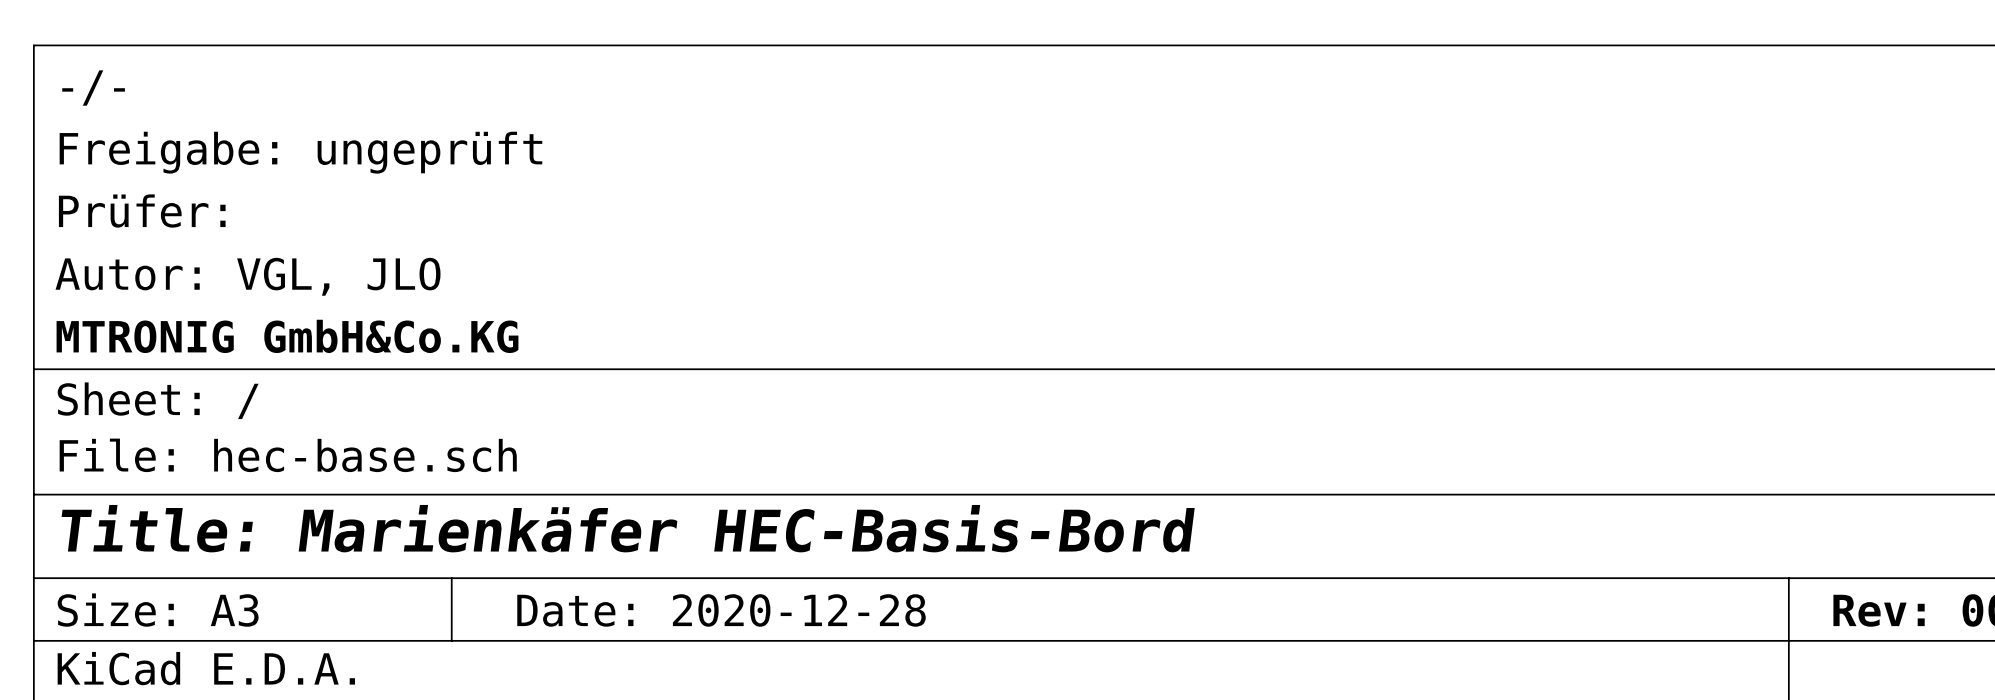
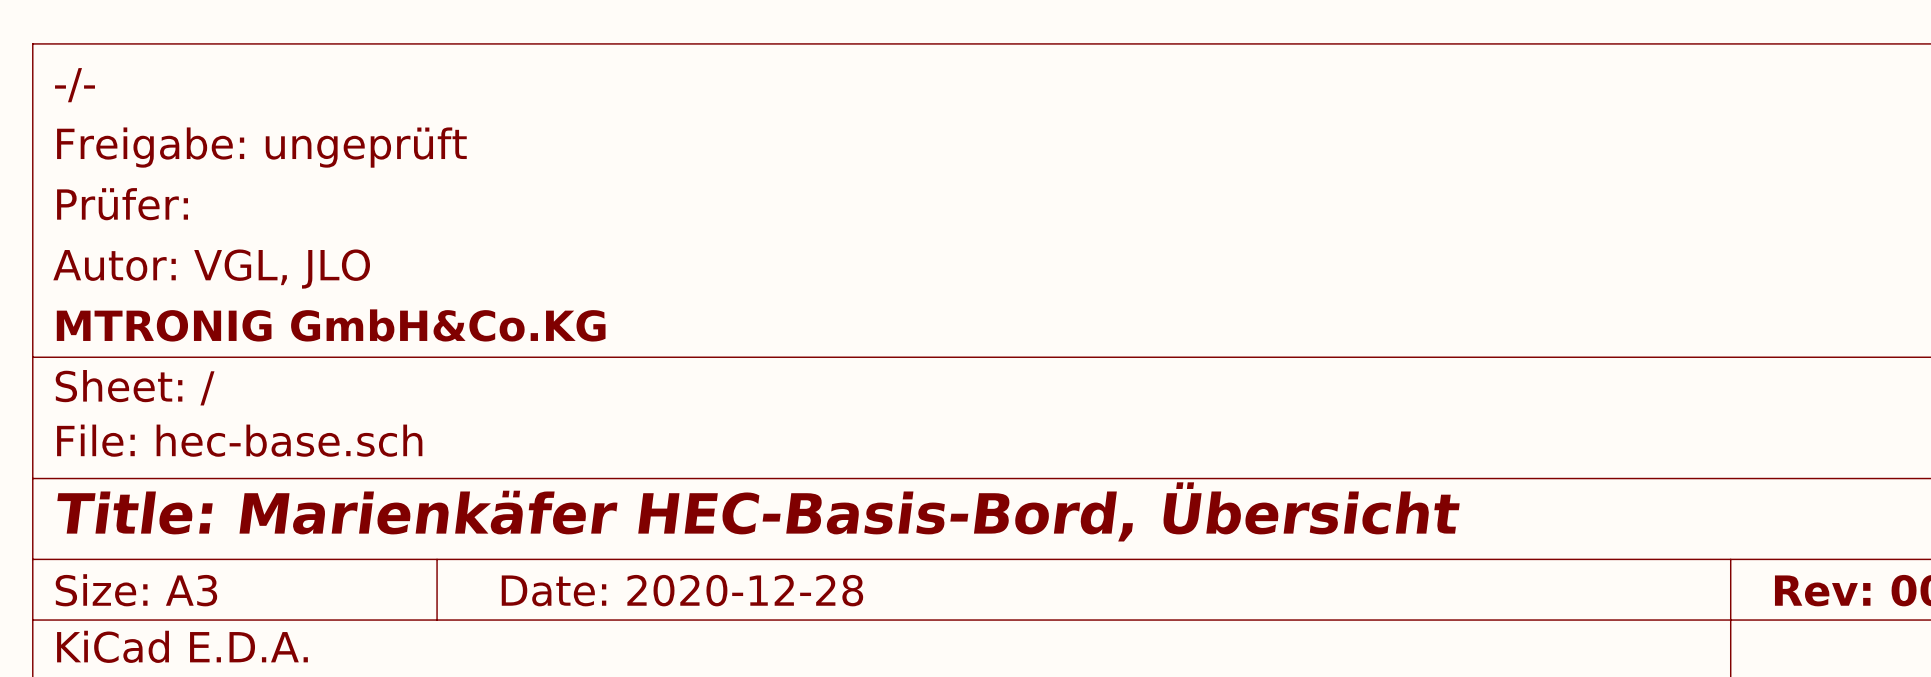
title block: Title: Marienkäfer HEC-Basis-Bord (628, 528) -> Title: Marienkäfer HEC-Basis-Bord, Übersicht (758, 511)

